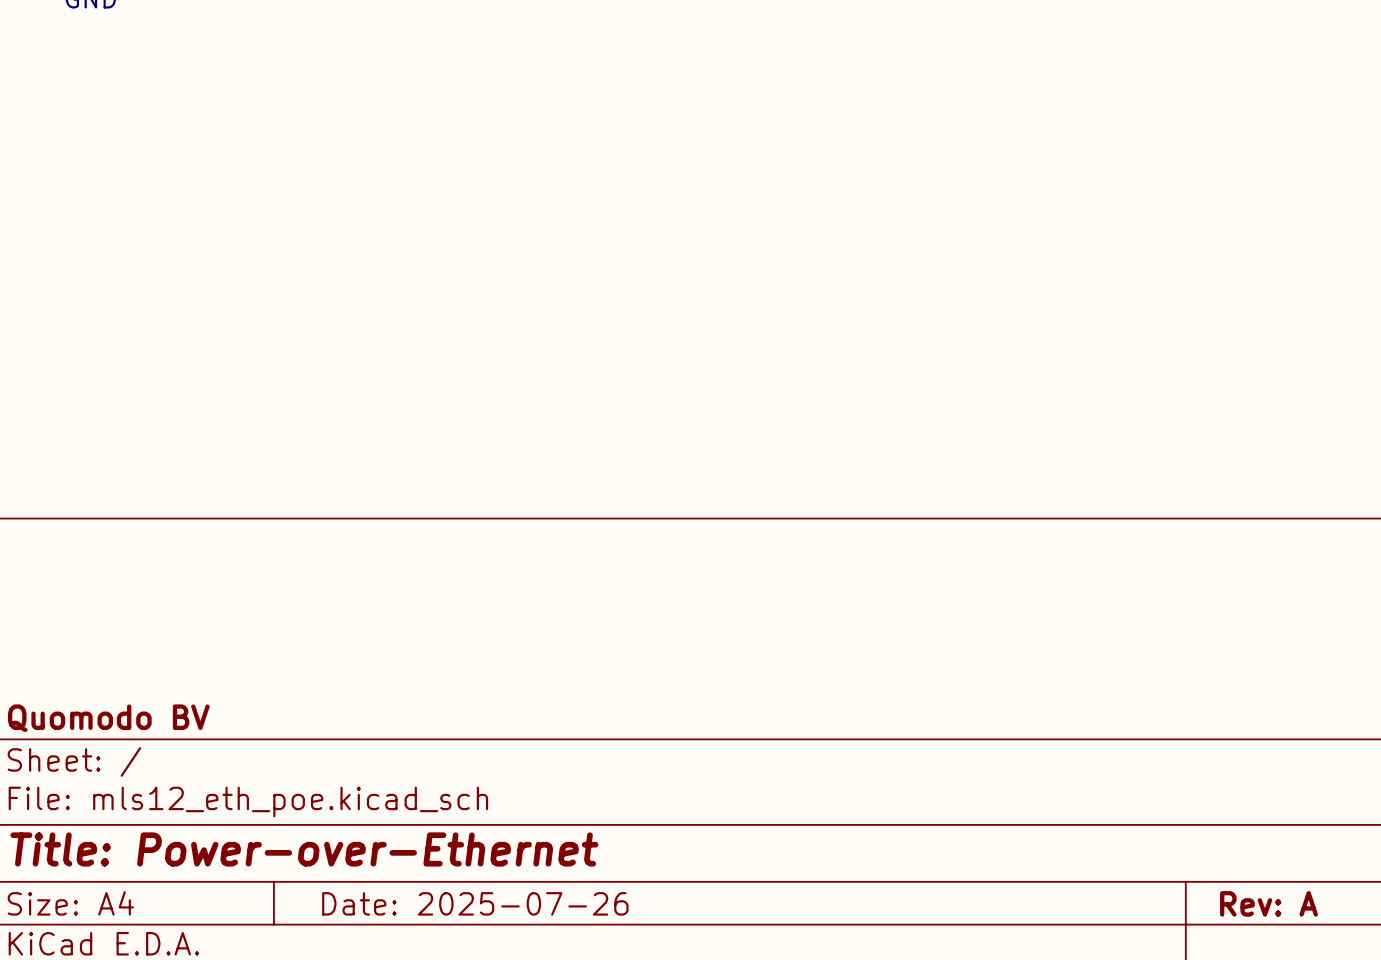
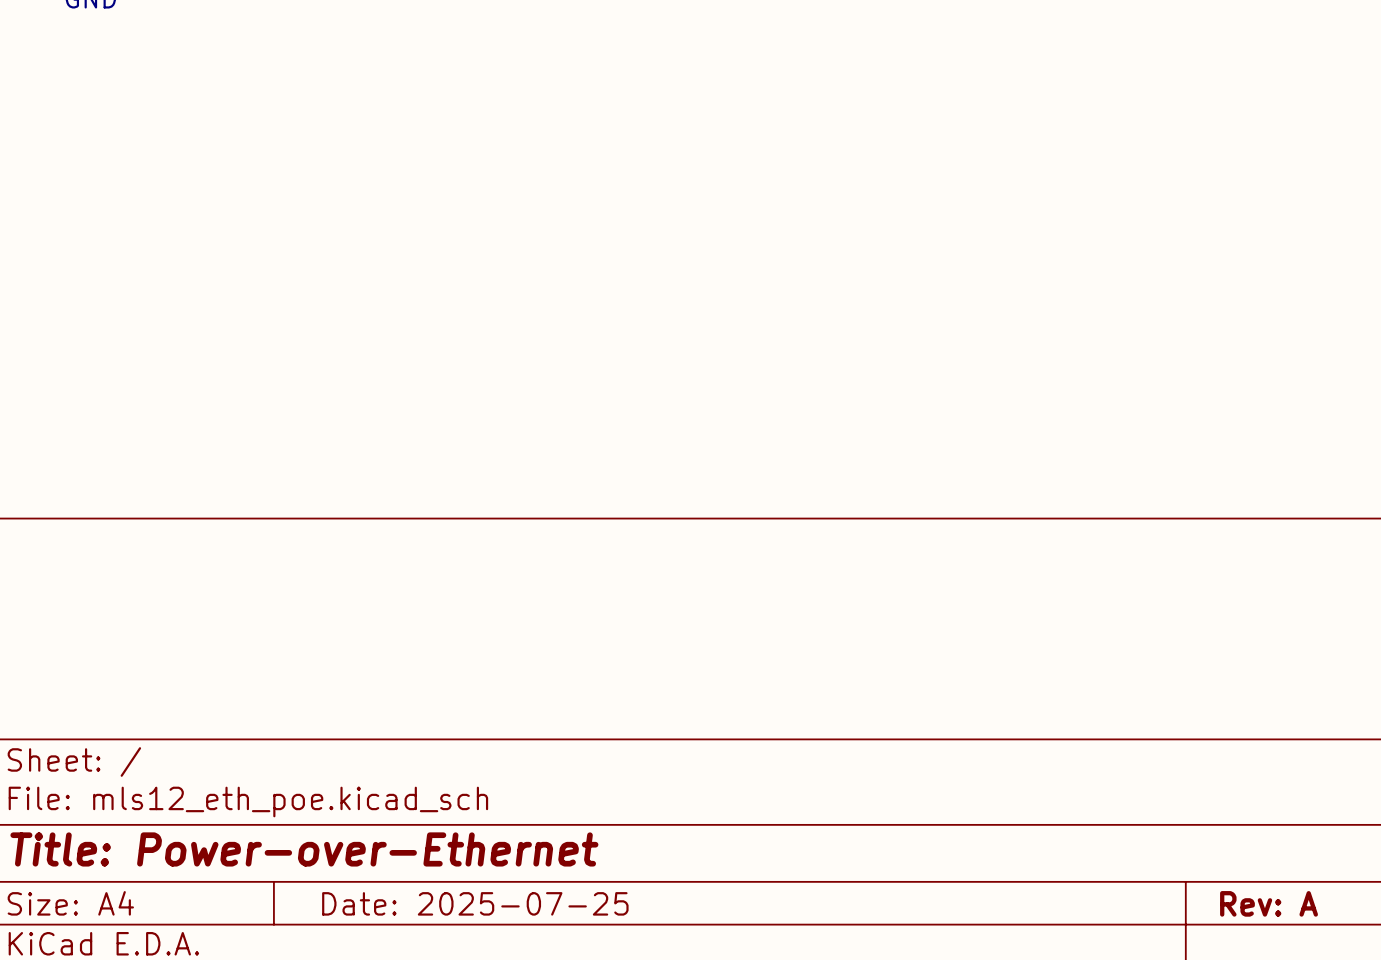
title block: Quomodo BV (108, 718) -> none
title block: Date: 2025-07-26 (475, 903) -> Date: 2025-07-25 (475, 903)

